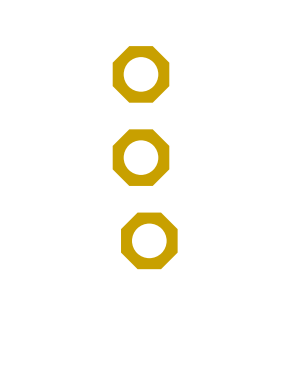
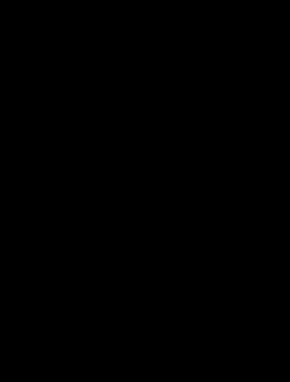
part: (141, 74) -> none
part: (141, 157) -> none
part: (149, 240) -> none

